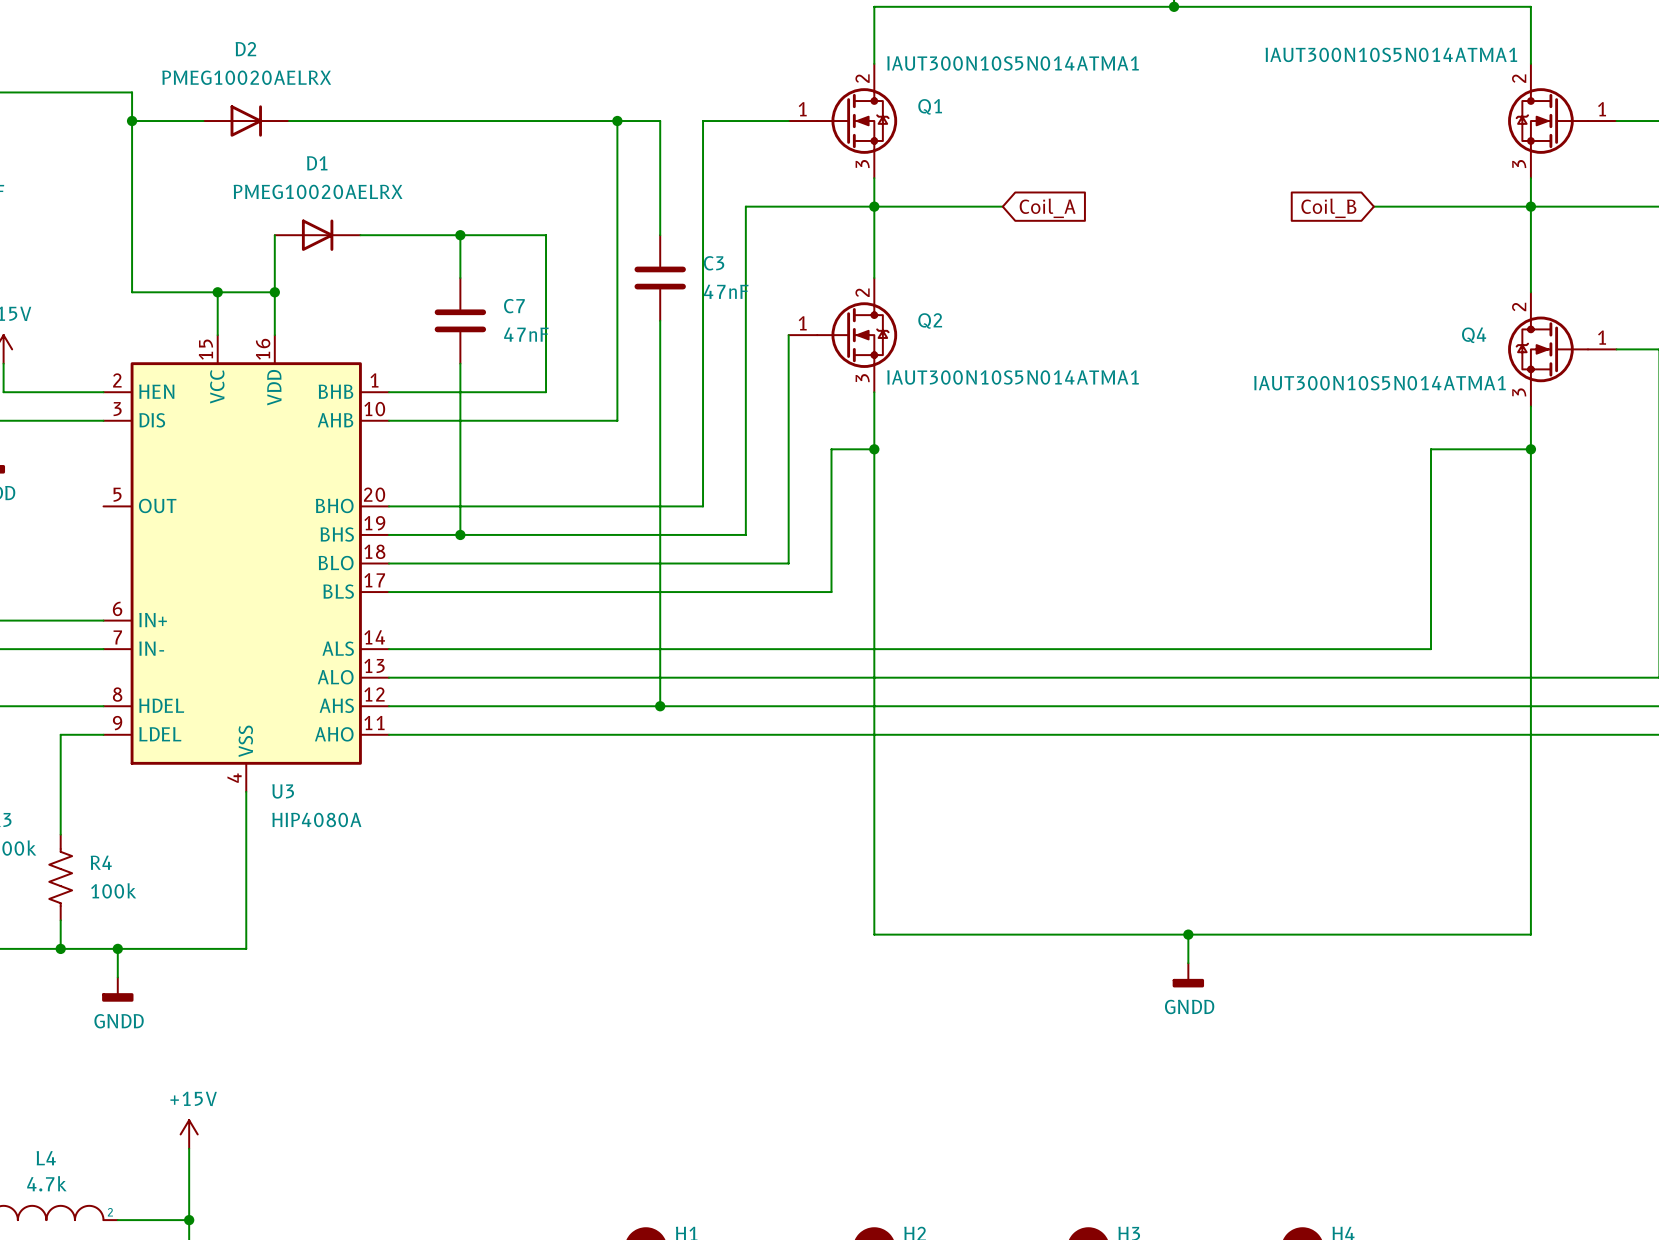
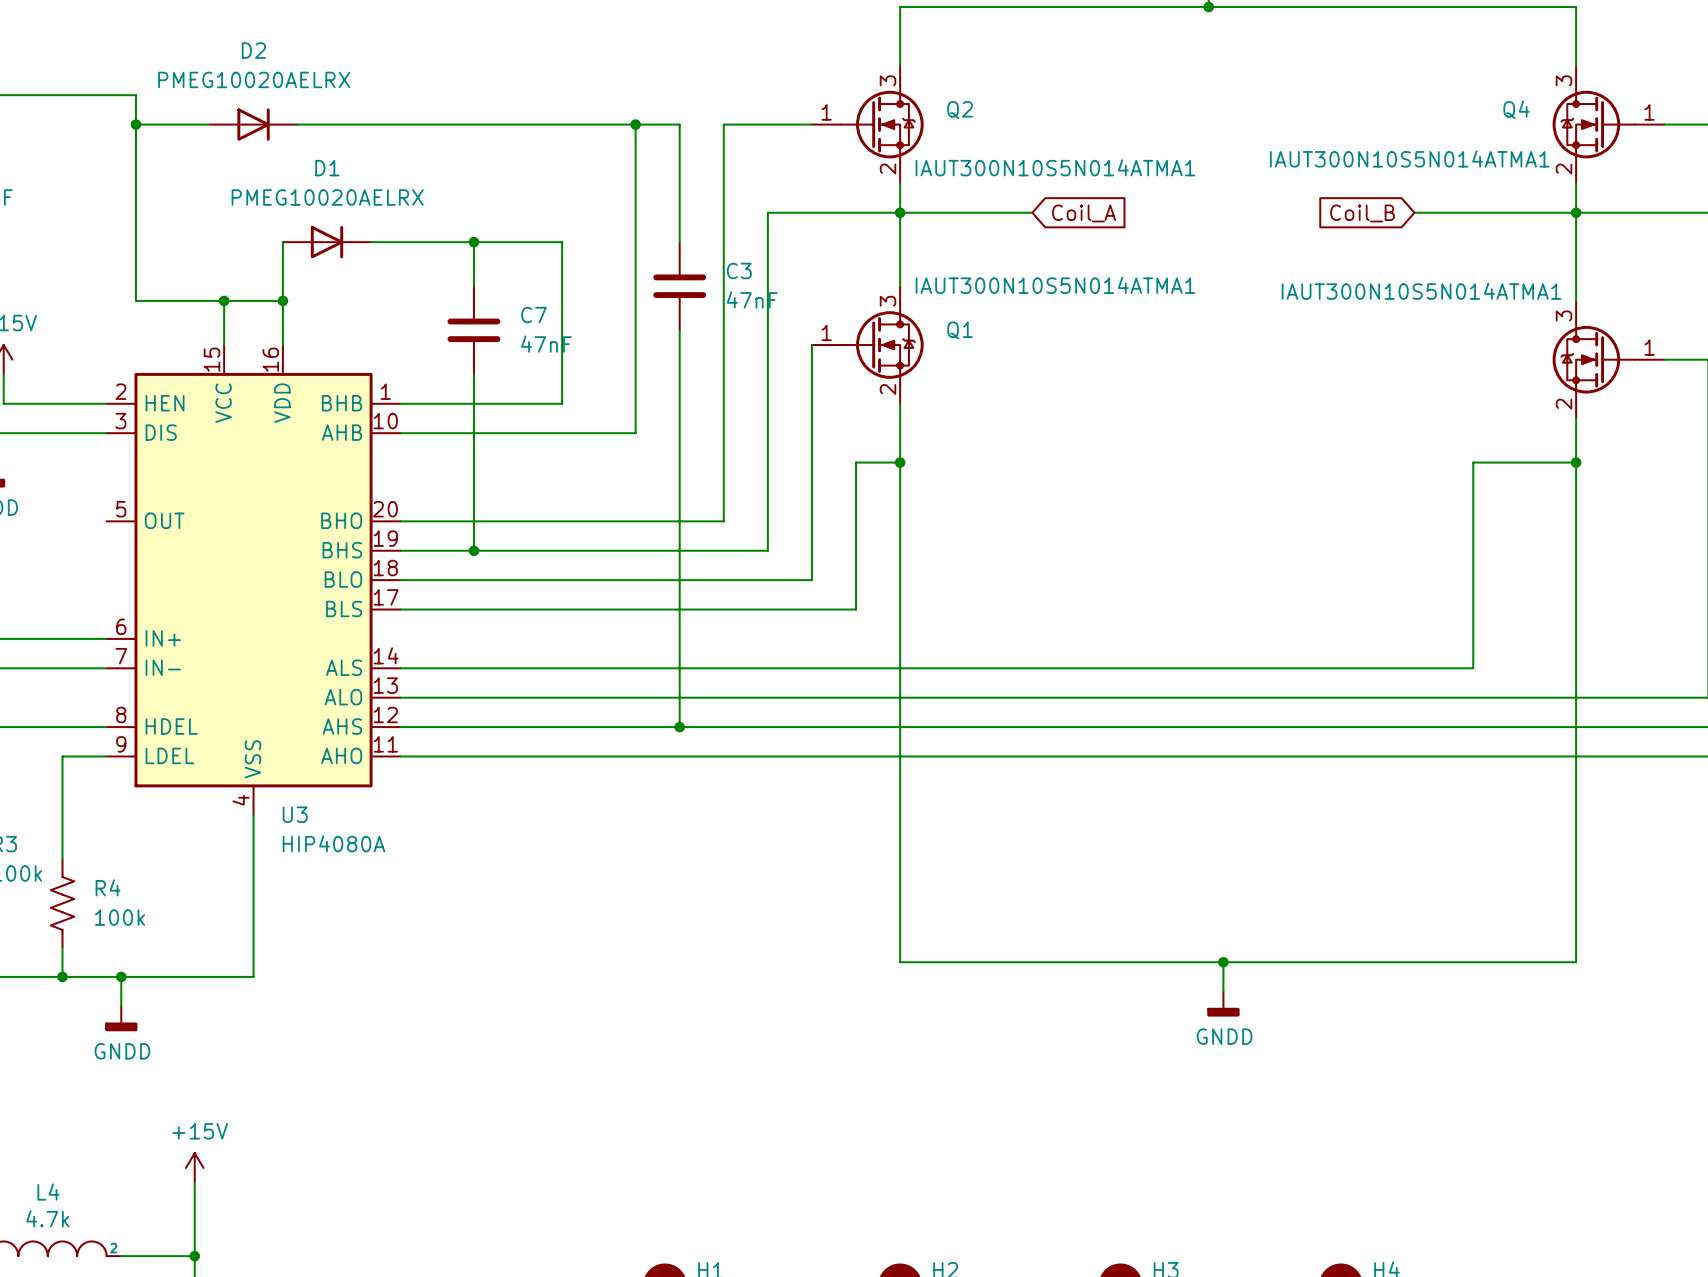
Q1 pin number: 2 (862, 78) -> 3 (888, 301)
Q1 position: (842, 121) -> (867, 345)
part: IAUT300N10S5N014ATMA1 (1562, 121) -> none
Q1 pin number: 3 (862, 164) -> 2 (888, 389)
Q2 pin number: 2 (862, 292) -> 3 (888, 80)
Q4 pin number: 2 (1519, 307) -> 3 (1564, 80)
Q2 position: (842, 335) -> (867, 124)
Q4 position: (1562, 349) -> (1608, 124)
part: none -> IAUT300N10S5N014ATMA1 (1608, 359)
Q2 pin number: 3 (862, 378) -> 2 (888, 169)
Q4 pin number: 3 (1519, 392) -> 2 (1564, 169)

